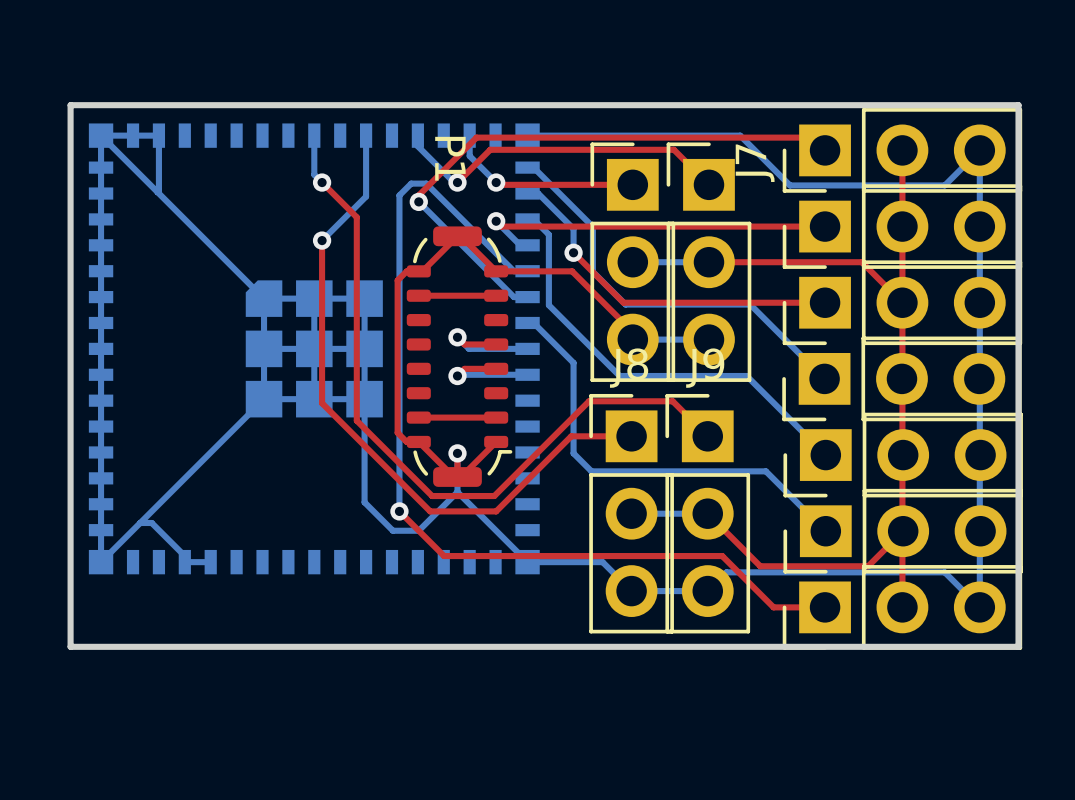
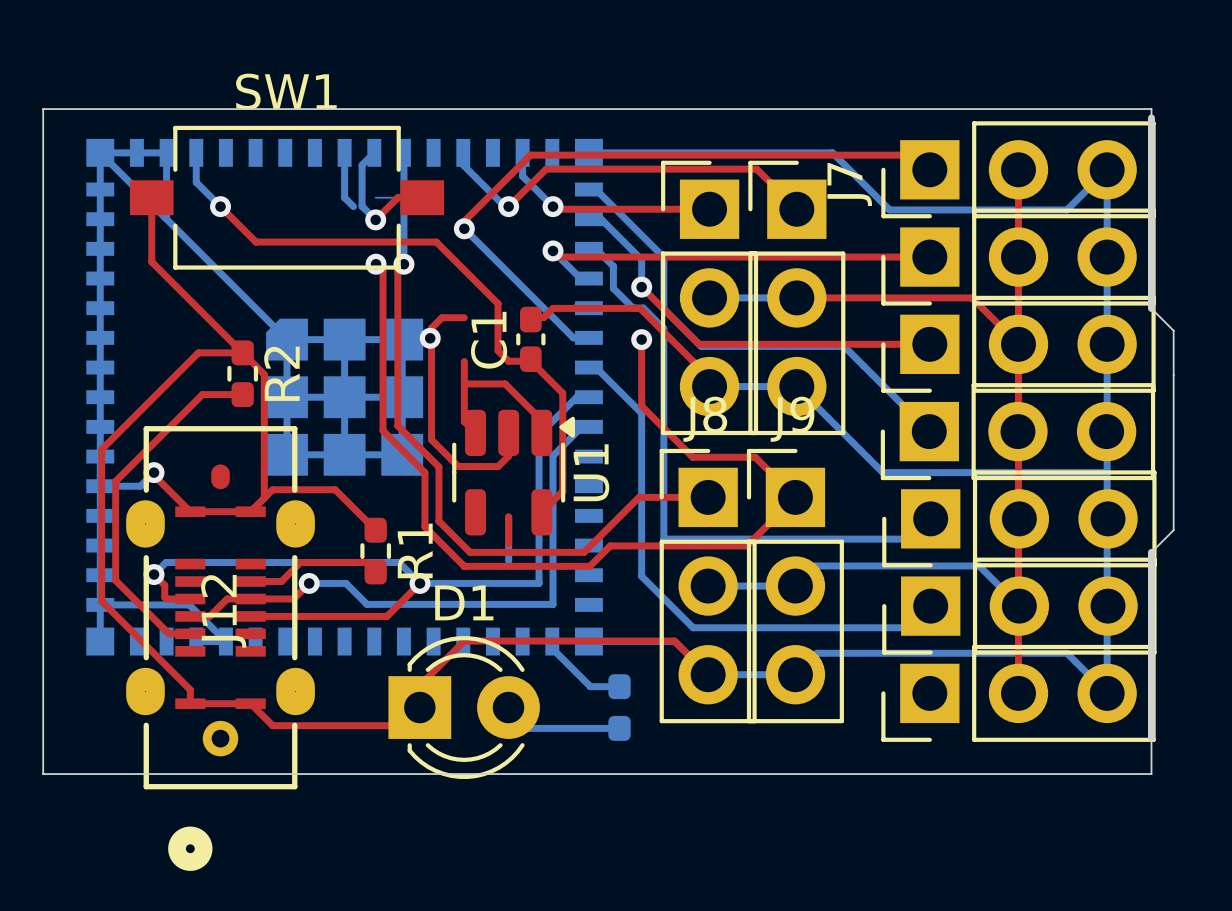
board edge: (1018, 105) (70, 105) (70, 646) (1018, 646) -> (1151, 117) (1151, 109) (43, 109) (43, 774) (1151, 774) (1151, 738)
bottom track: none -> (196, 152) (196, 182) (220, 206)
bottom track: none -> (374, 152) (362, 165) (362, 206) (375, 219)
top track: none -> (151, 197) (151, 261) (264, 374) (264, 498)
SW1: none -> (287, 197)
bottom track: none -> (375, 197) (393, 197)
top track: none -> (422, 197) (397, 197) (375, 219)
top track: none -> (220, 206) (255, 242) (436, 242) (498, 303) (498, 350) (508, 361) (530, 361) (562, 393) (562, 491) (541, 512)
via: none -> (220, 206)
top track: (322, 182) (356, 217) (356, 420) (432, 496) (494, 496) (589, 401) (618, 401) -> (641, 339) (641, 406) (692, 457)
via position: (322, 182) -> (375, 219)
bottom track: (366, 196) (322, 240) -> (403, 222) (403, 264)
top track: none -> (376, 264) (383, 271) (383, 430) (424, 472) (424, 527) (464, 566) (589, 566) (610, 545) (746, 545) (795, 497)
via: none -> (403, 264)
top track: (322, 240) (322, 403) (430, 511) (496, 511) (523, 484) -> (403, 264) (397, 270) (397, 425) (438, 466) (438, 521) (470, 552) (584, 552)
via position: (322, 240) -> (376, 264)
bottom track: (548, 253) (548, 305) (619, 376) (746, 376) (825, 455) -> (613, 288) (633, 308) (643, 308) (663, 328) (663, 539) (910, 539) (930, 518)
top track: (496, 271) (461, 236) (457, 236) (422, 271) (406, 271) (397, 280) (397, 432) (406, 441) (418, 441) (453, 476) (461, 476) (496, 441) -> (553, 308) (543, 317) (530, 317)
bottom track: (513, 271) (426, 183) (411, 183) (399, 195) (399, 511) -> none
board edge: (1018, 271) (1018, 484) -> (1151, 308) (1173, 330) (1173, 530) (1151, 552)
top track: none -> (464, 317) (442, 317) (431, 328) (431, 439) (458, 466) (498, 466) (508, 456) (508, 432)
top track: (418, 295) (496, 295) -> none
via: none -> (430, 338)
C1: none -> (530, 339)
via: none -> (641, 339)
top track: none -> (242, 352) (198, 352) (101, 449) (101, 601) (190, 689) (190, 703) (250, 703) (272, 725) (401, 725) (419, 707) (419, 685) (464, 641) (674, 641) (708, 674)
top track: none -> (464, 361) (464, 421) (475, 432)
R2: none -> (242, 373)
top track: none -> (464, 383) (505, 383) (541, 420) (541, 432)
top track: (457, 337) (464, 344) (496, 344) -> none
bottom track: (457, 337) (469, 348) (516, 348) -> (154, 574) (166, 562) (399, 562) (420, 583) (539, 583) (539, 434) (576, 397)
via: (457, 337) -> none
bottom track: none -> (796, 386) (882, 472) (1107, 472)
top track: none -> (242, 394) (202, 394) (115, 481) (115, 580) (169, 633) (190, 633)
P1: (459, 356) -> none
top track: (496, 368) (464, 368) (457, 376) -> none
bottom track: (521, 374) (457, 376) -> (581, 426) (553, 455) (553, 604) (367, 604) (346, 583) (309, 583)
via: (457, 376) -> none
bottom track: (264, 399) (101, 562) -> none
bottom track: (364, 399) (364, 502) (392, 530) (418, 530) (457, 492) (527, 562) -> none
top track: none -> (150, 472) (154, 472) (154, 475) (190, 511) (250, 511) (272, 489) (335, 489) (375, 530)
bottom track: none -> (154, 472) (140, 486) (100, 486)
via: none -> (154, 472)
U1: none -> (513, 472)
top track: (418, 417) (496, 417) -> none
via: (457, 453) -> none
bottom track: (573, 453) (591, 471) (765, 471) (825, 531) -> (641, 516) (641, 576) (693, 627) (909, 627) (930, 606)
R1: none -> (375, 551)
top track: none -> (375, 571) (366, 562) (300, 562) (281, 581) (250, 581)
top track: none -> (154, 574) (164, 585) (166, 598) (190, 598)
via: none -> (154, 574)
top track: none -> (309, 583) (293, 598) (227, 598) (209, 616) (190, 616)
via: none -> (309, 583)
top track: none -> (420, 583) (387, 616) (250, 616)
top track: (399, 511) (444, 556) (722, 556) (773, 607) (804, 607) -> none
via position: (399, 511) -> (420, 583)
top track: (707, 513) (760, 566) (868, 566) (903, 531) -> none
bottom track: none -> (795, 586) (815, 565) (979, 565) (1019, 606)
bottom track: (140, 522) (151, 522) (184, 556) -> none
bottom track: none -> (100, 604) (189, 604) (225, 641)
bottom track: none -> (552, 641) (552, 648) (590, 686) (619, 686)
J12: none -> (220, 648)
D1: none -> (464, 707)
bottom track: none -> (508, 707) (529, 728) (619, 728)
part: none -> (619, 707)

